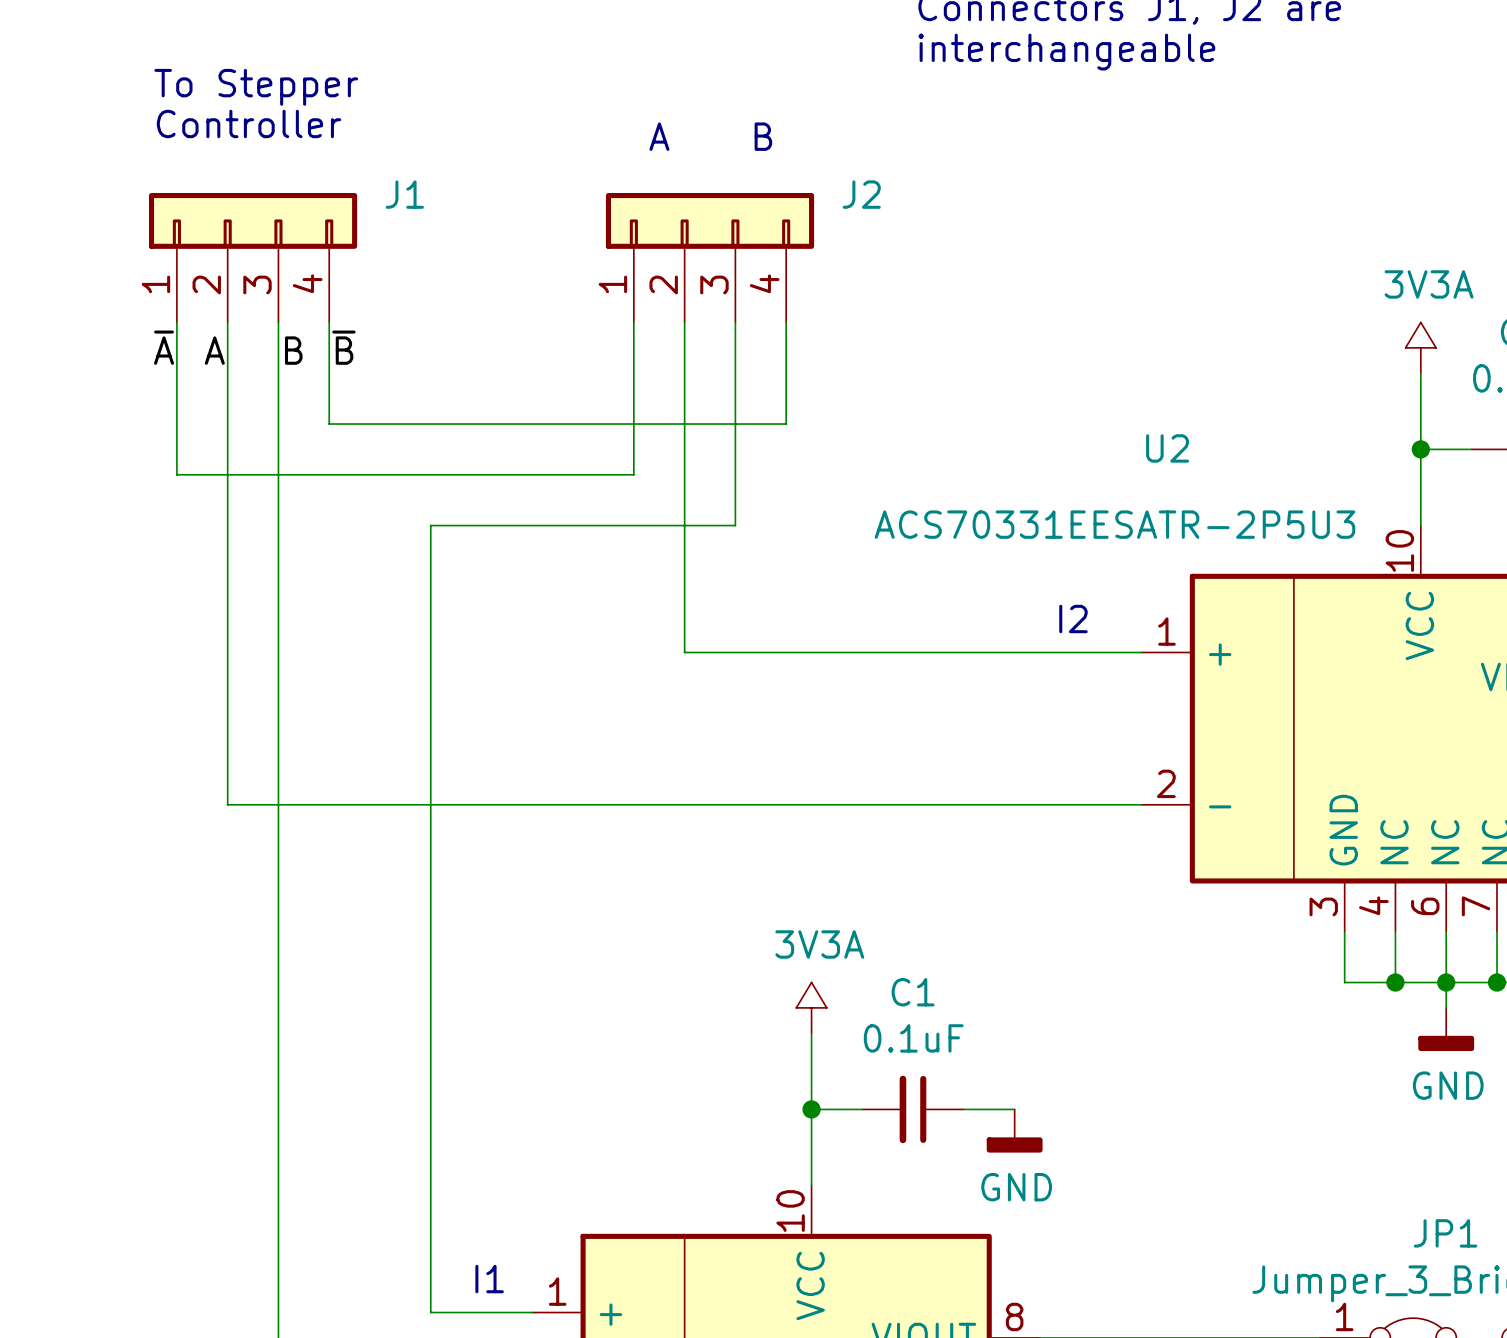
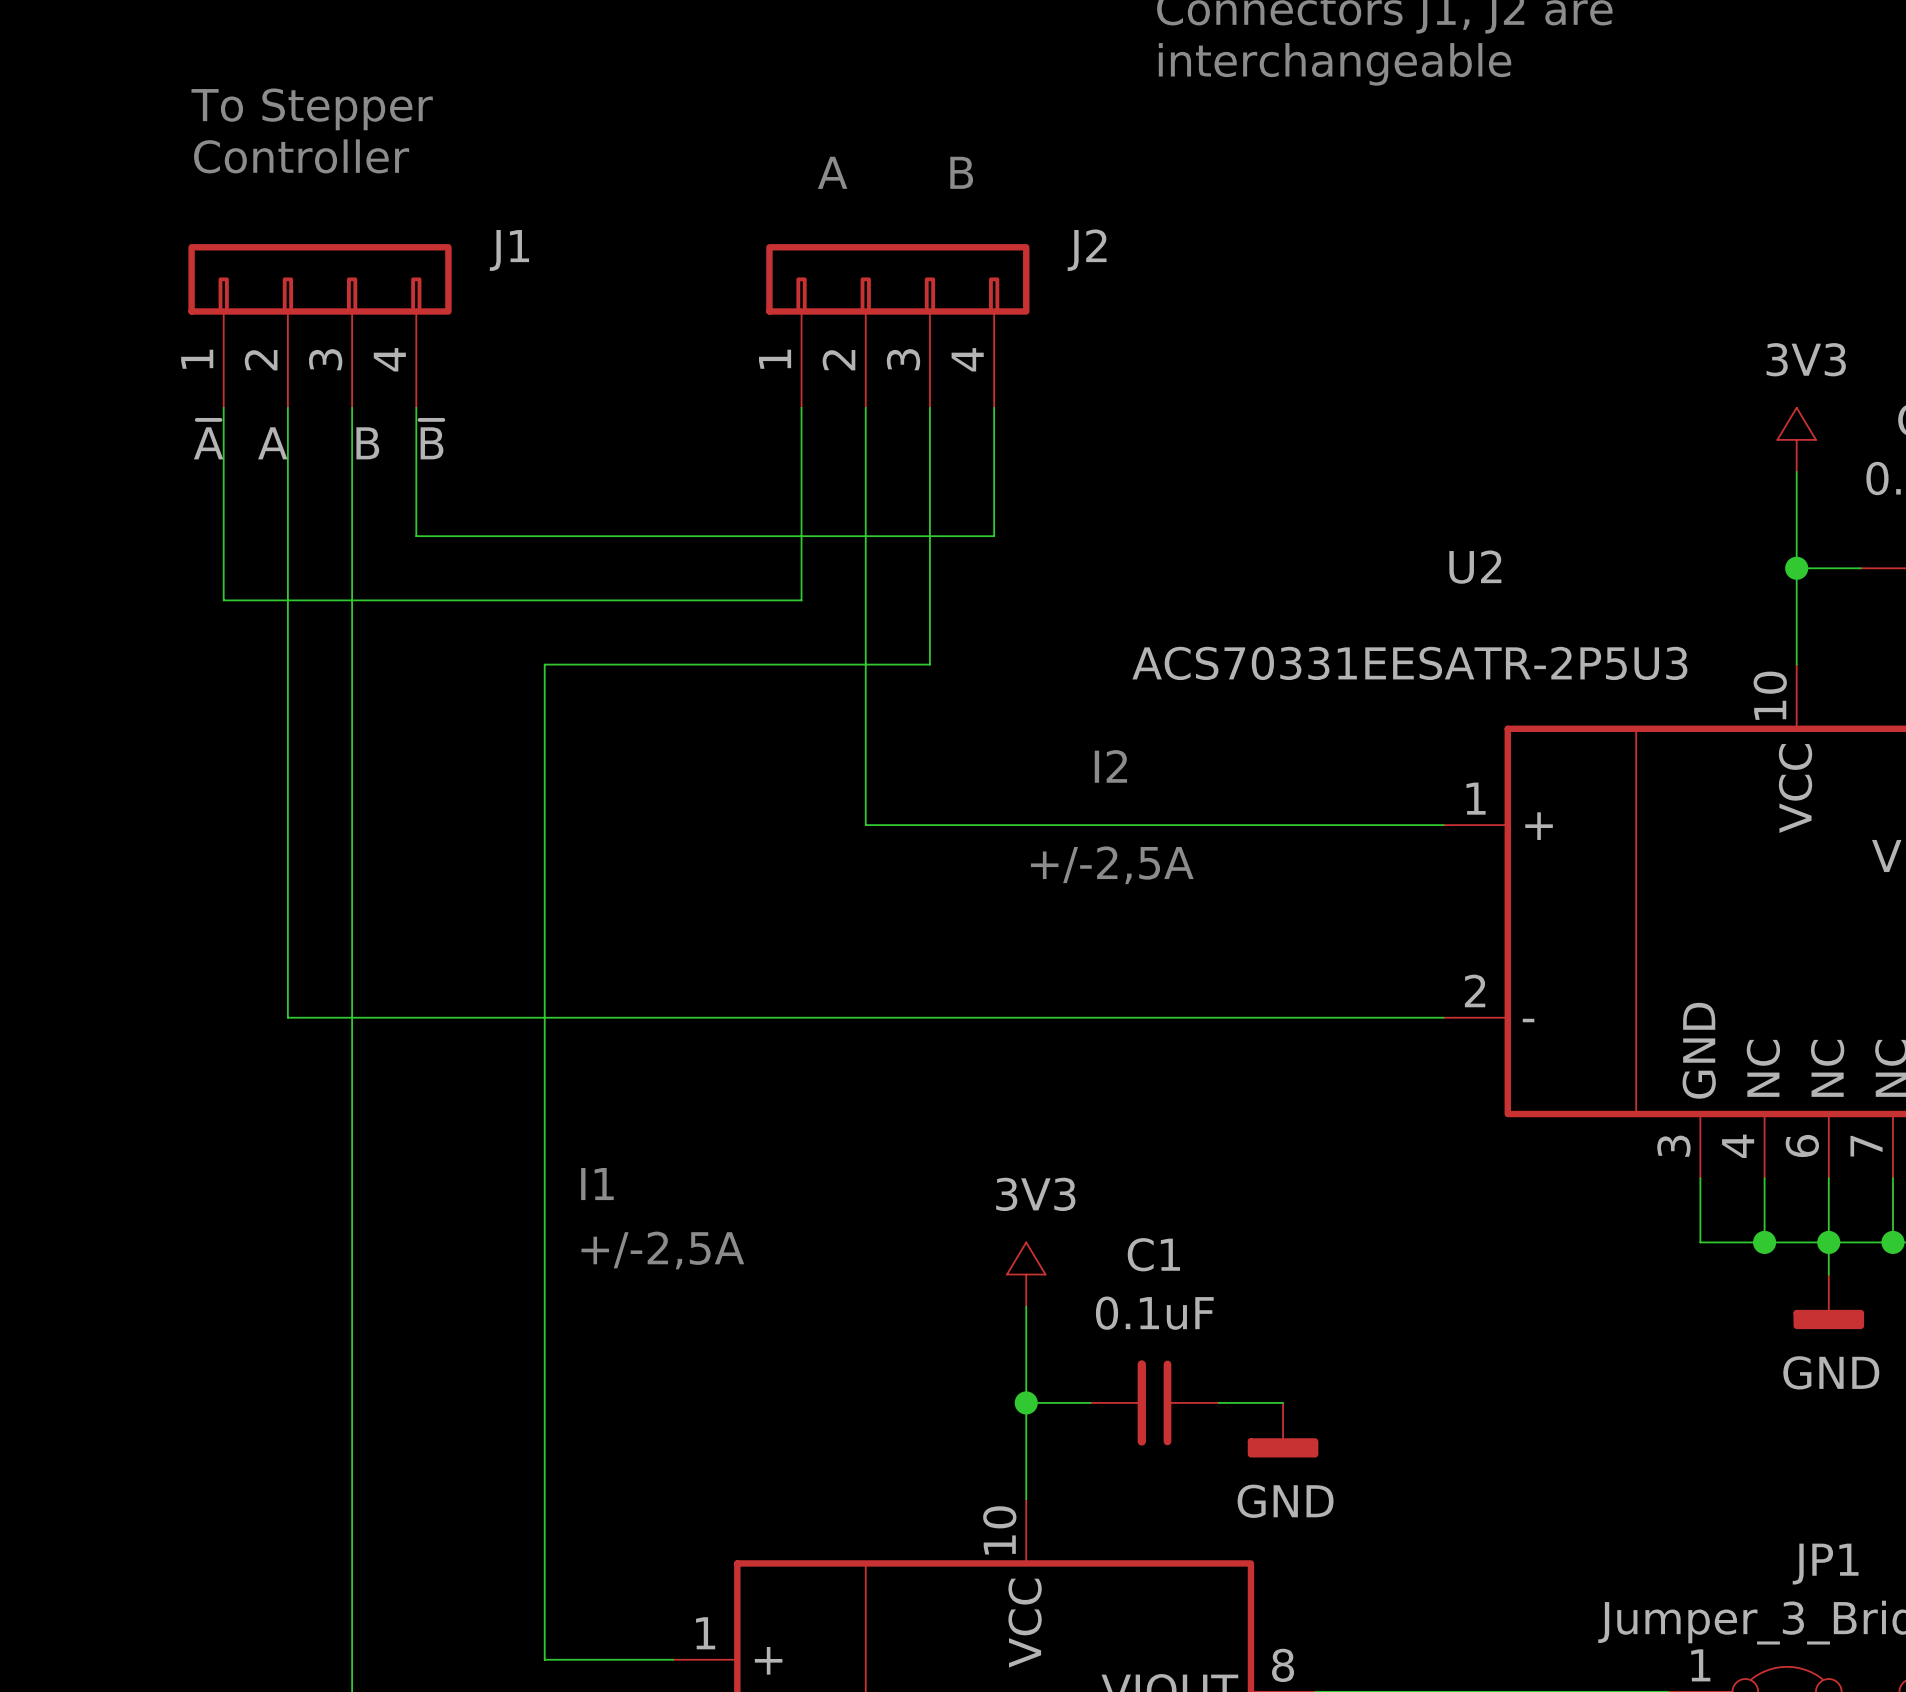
power symbol: 3V3A (1420, 347) -> 3V3 (1796, 439)
text position: I2 (1073, 619) -> I2 (1110, 766)
text: none -> +/-2,5A (1112, 865)
text: none -> +/-2,5A (662, 1250)
power symbol: 3V3A (811, 1007) -> 3V3 (1026, 1274)
text position: I1 (489, 1279) -> I1 (597, 1184)

